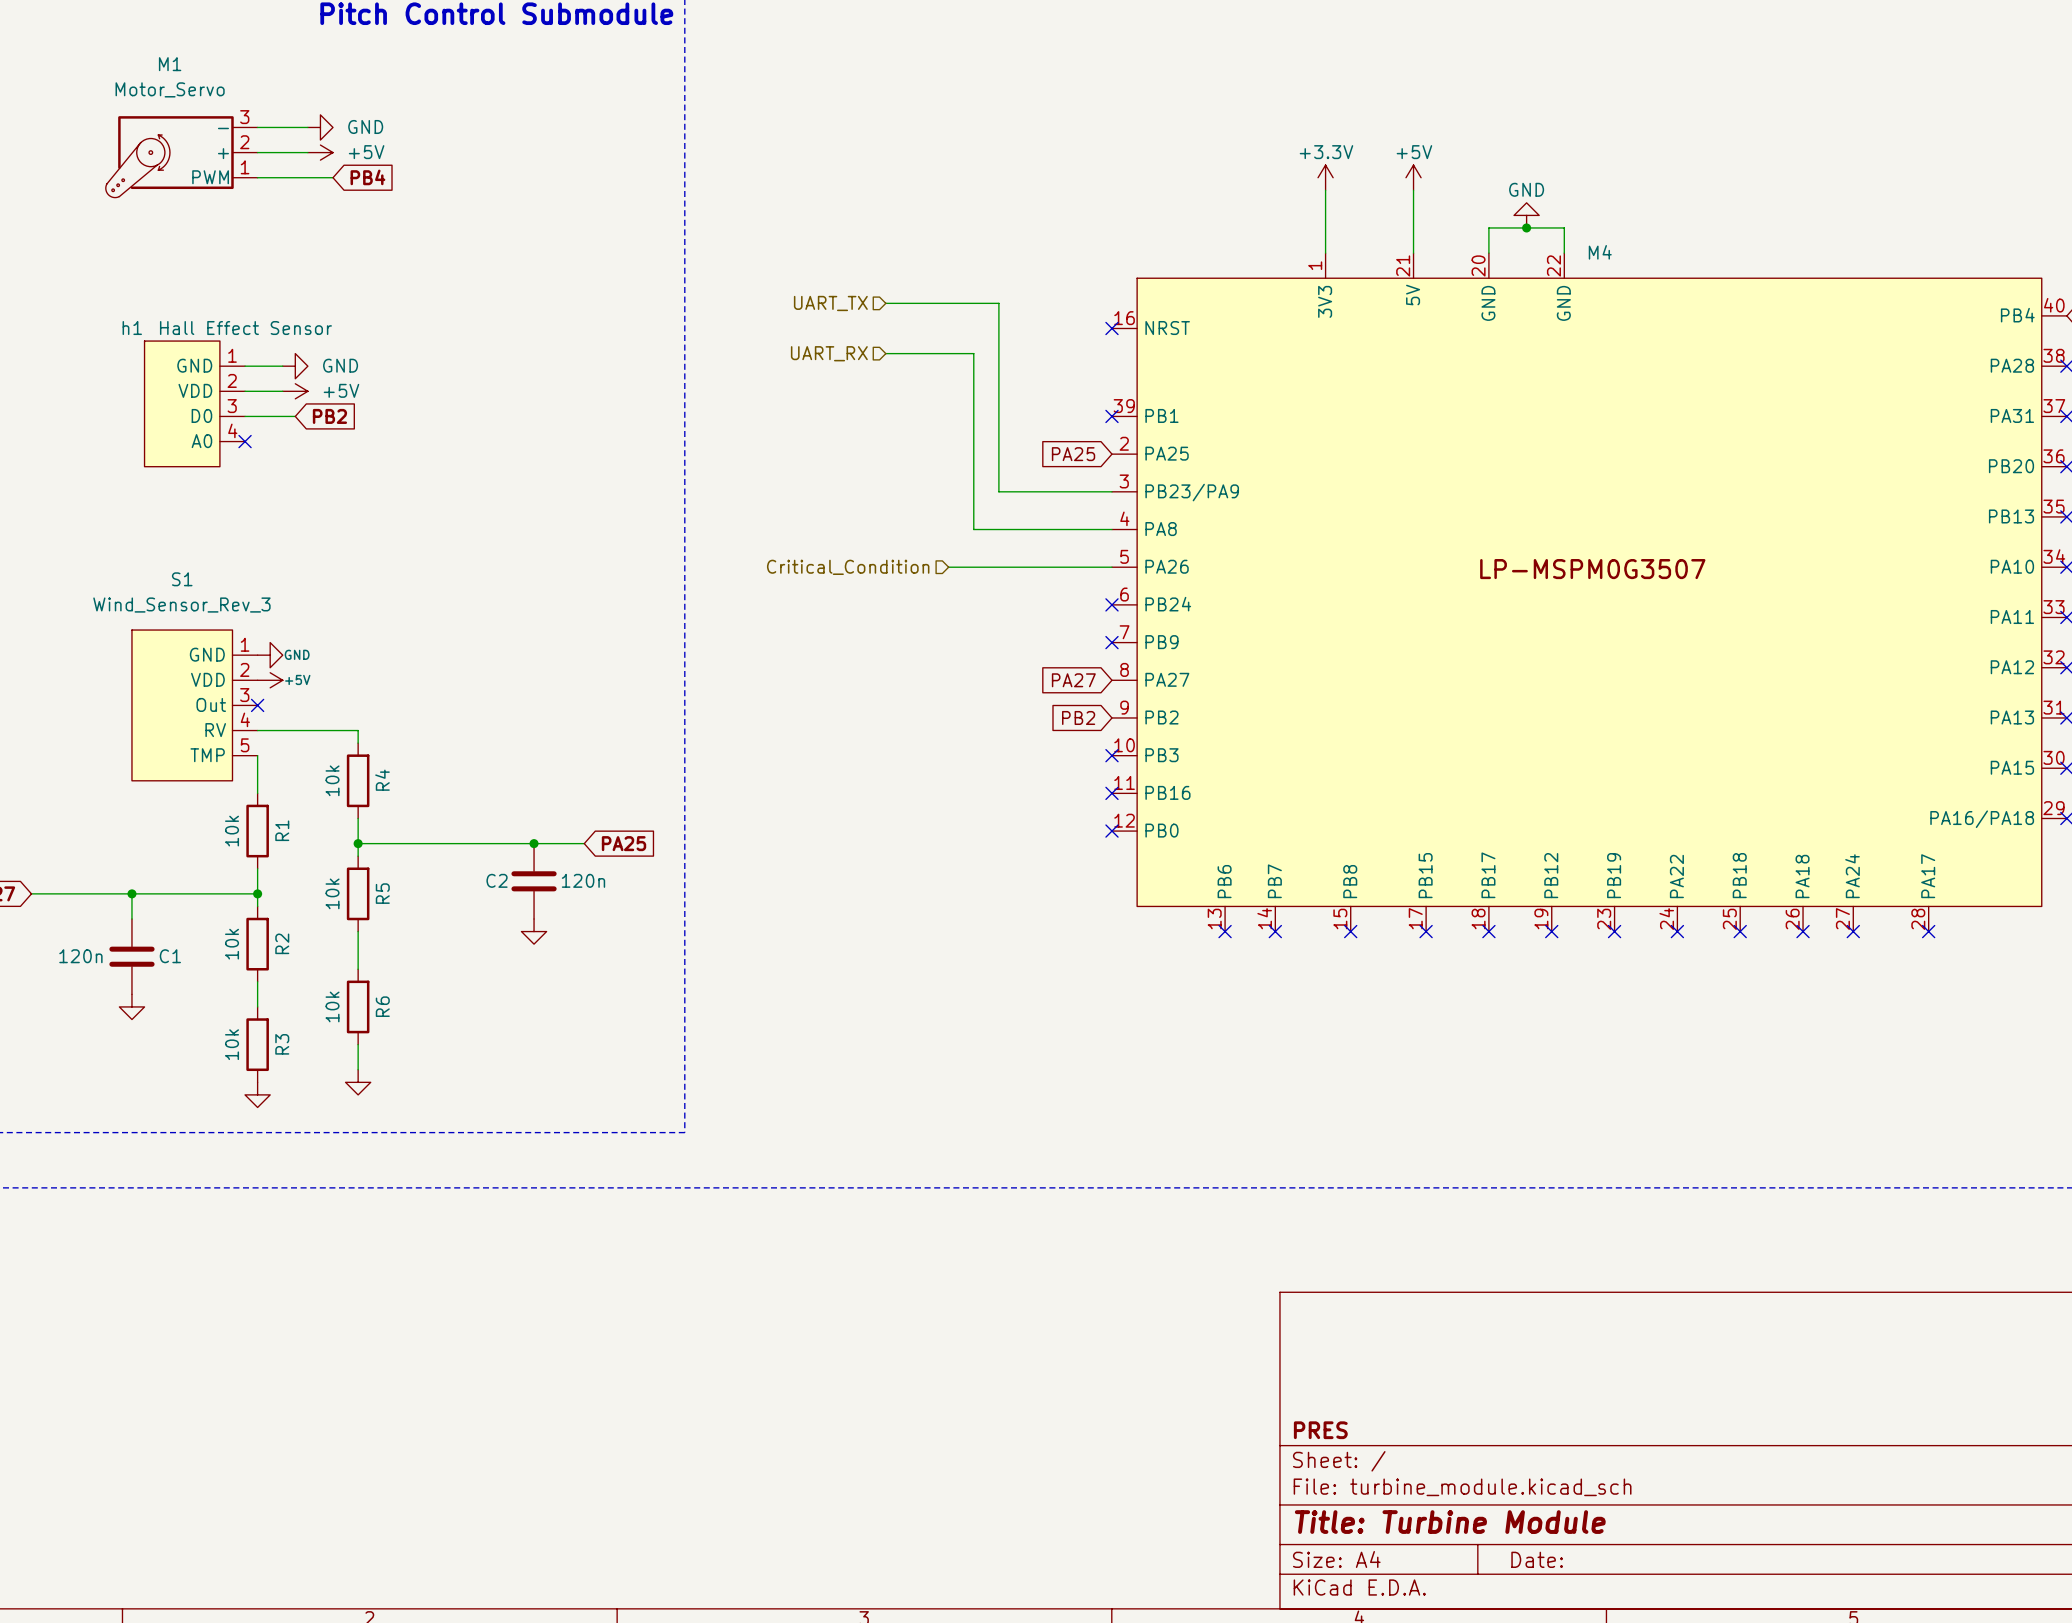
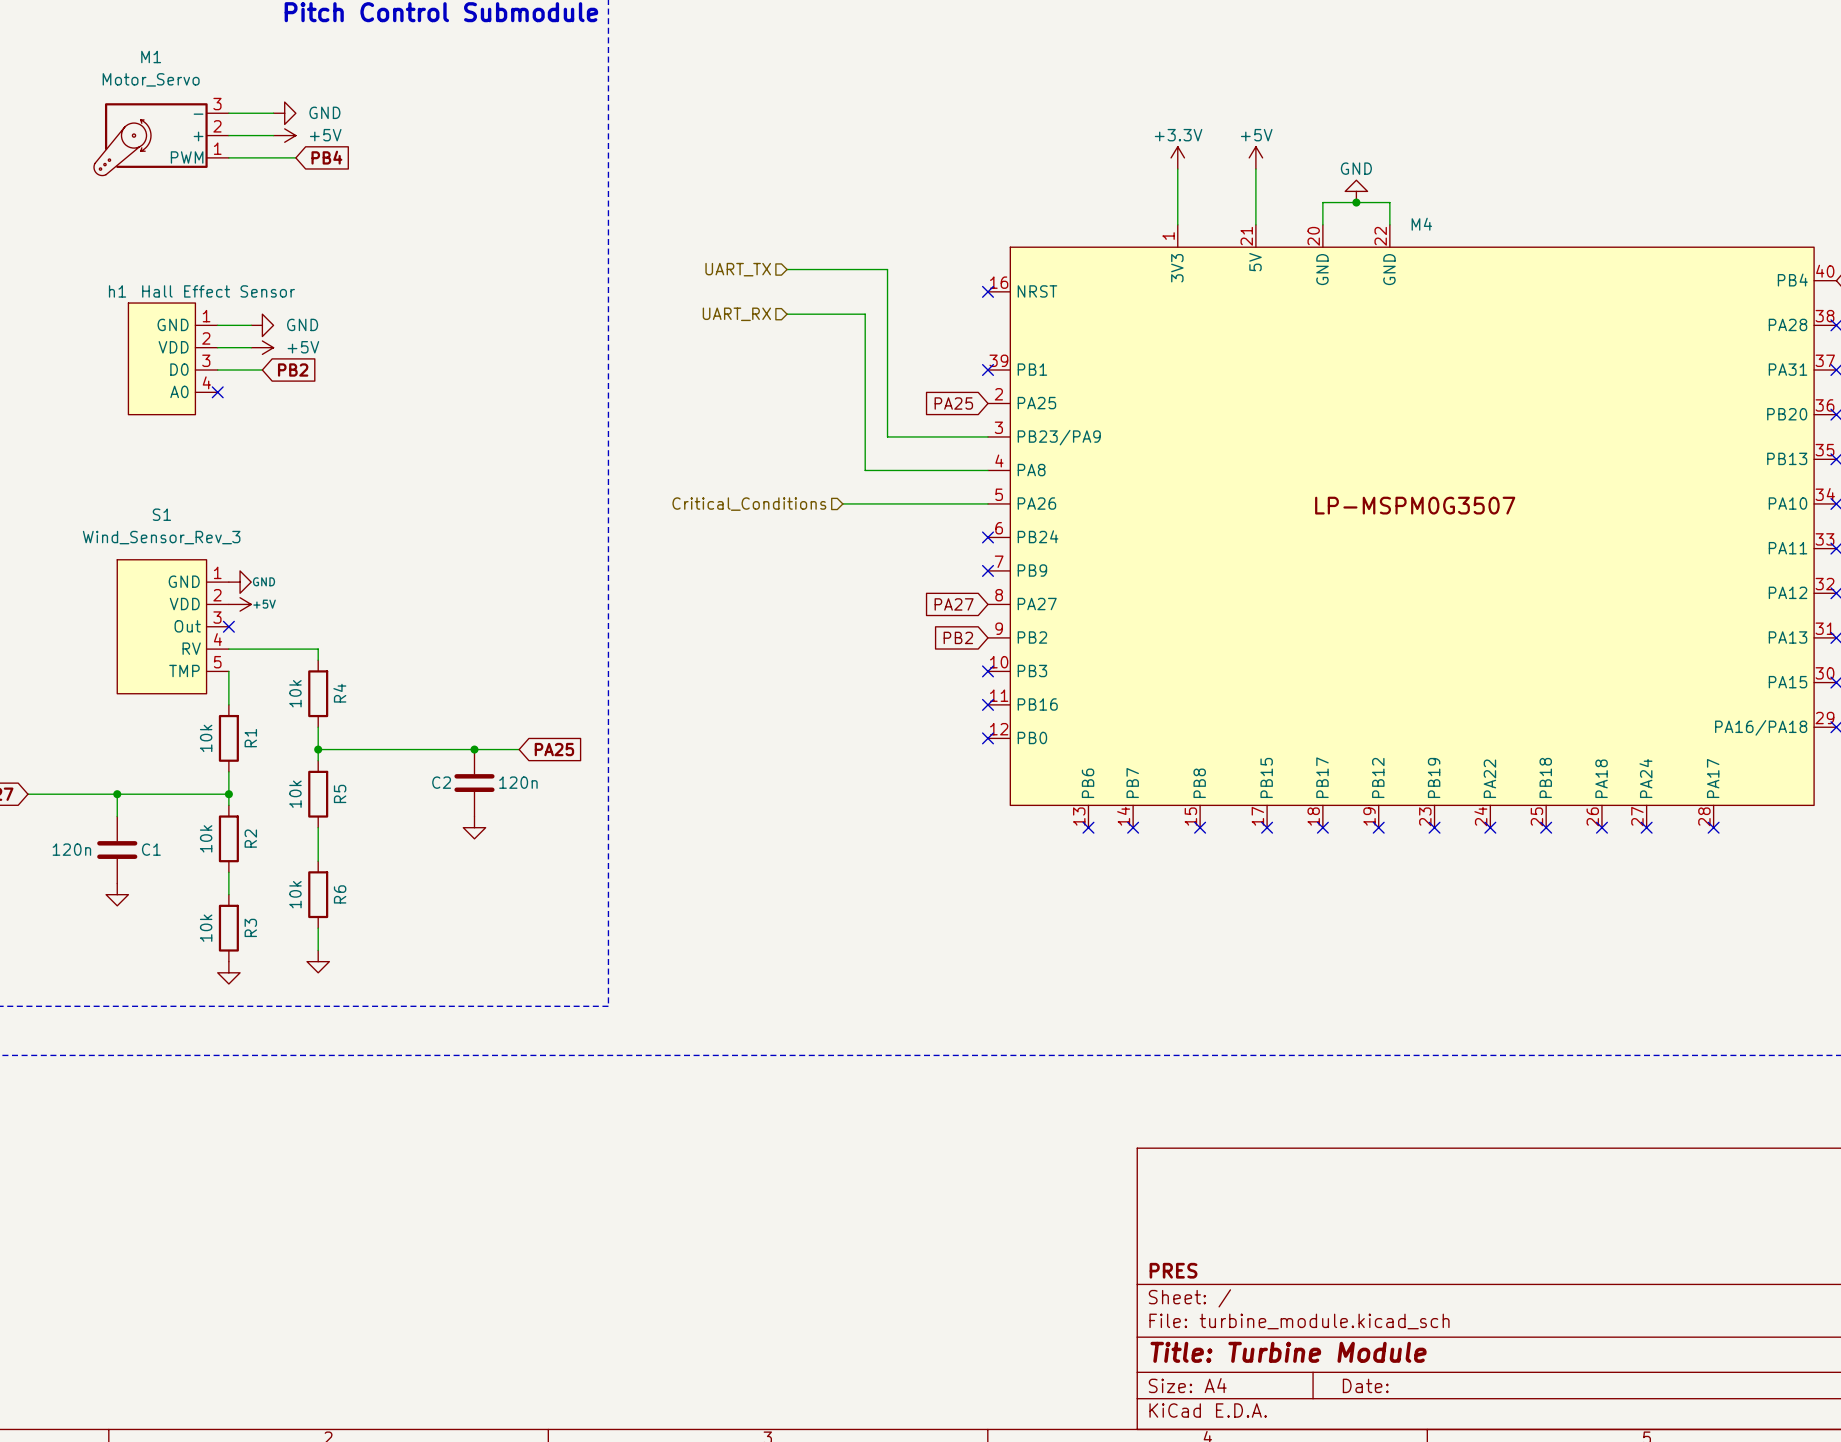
hierarchical label: Critical_Condition (848, 567) -> Critical_Conditions (749, 504)

